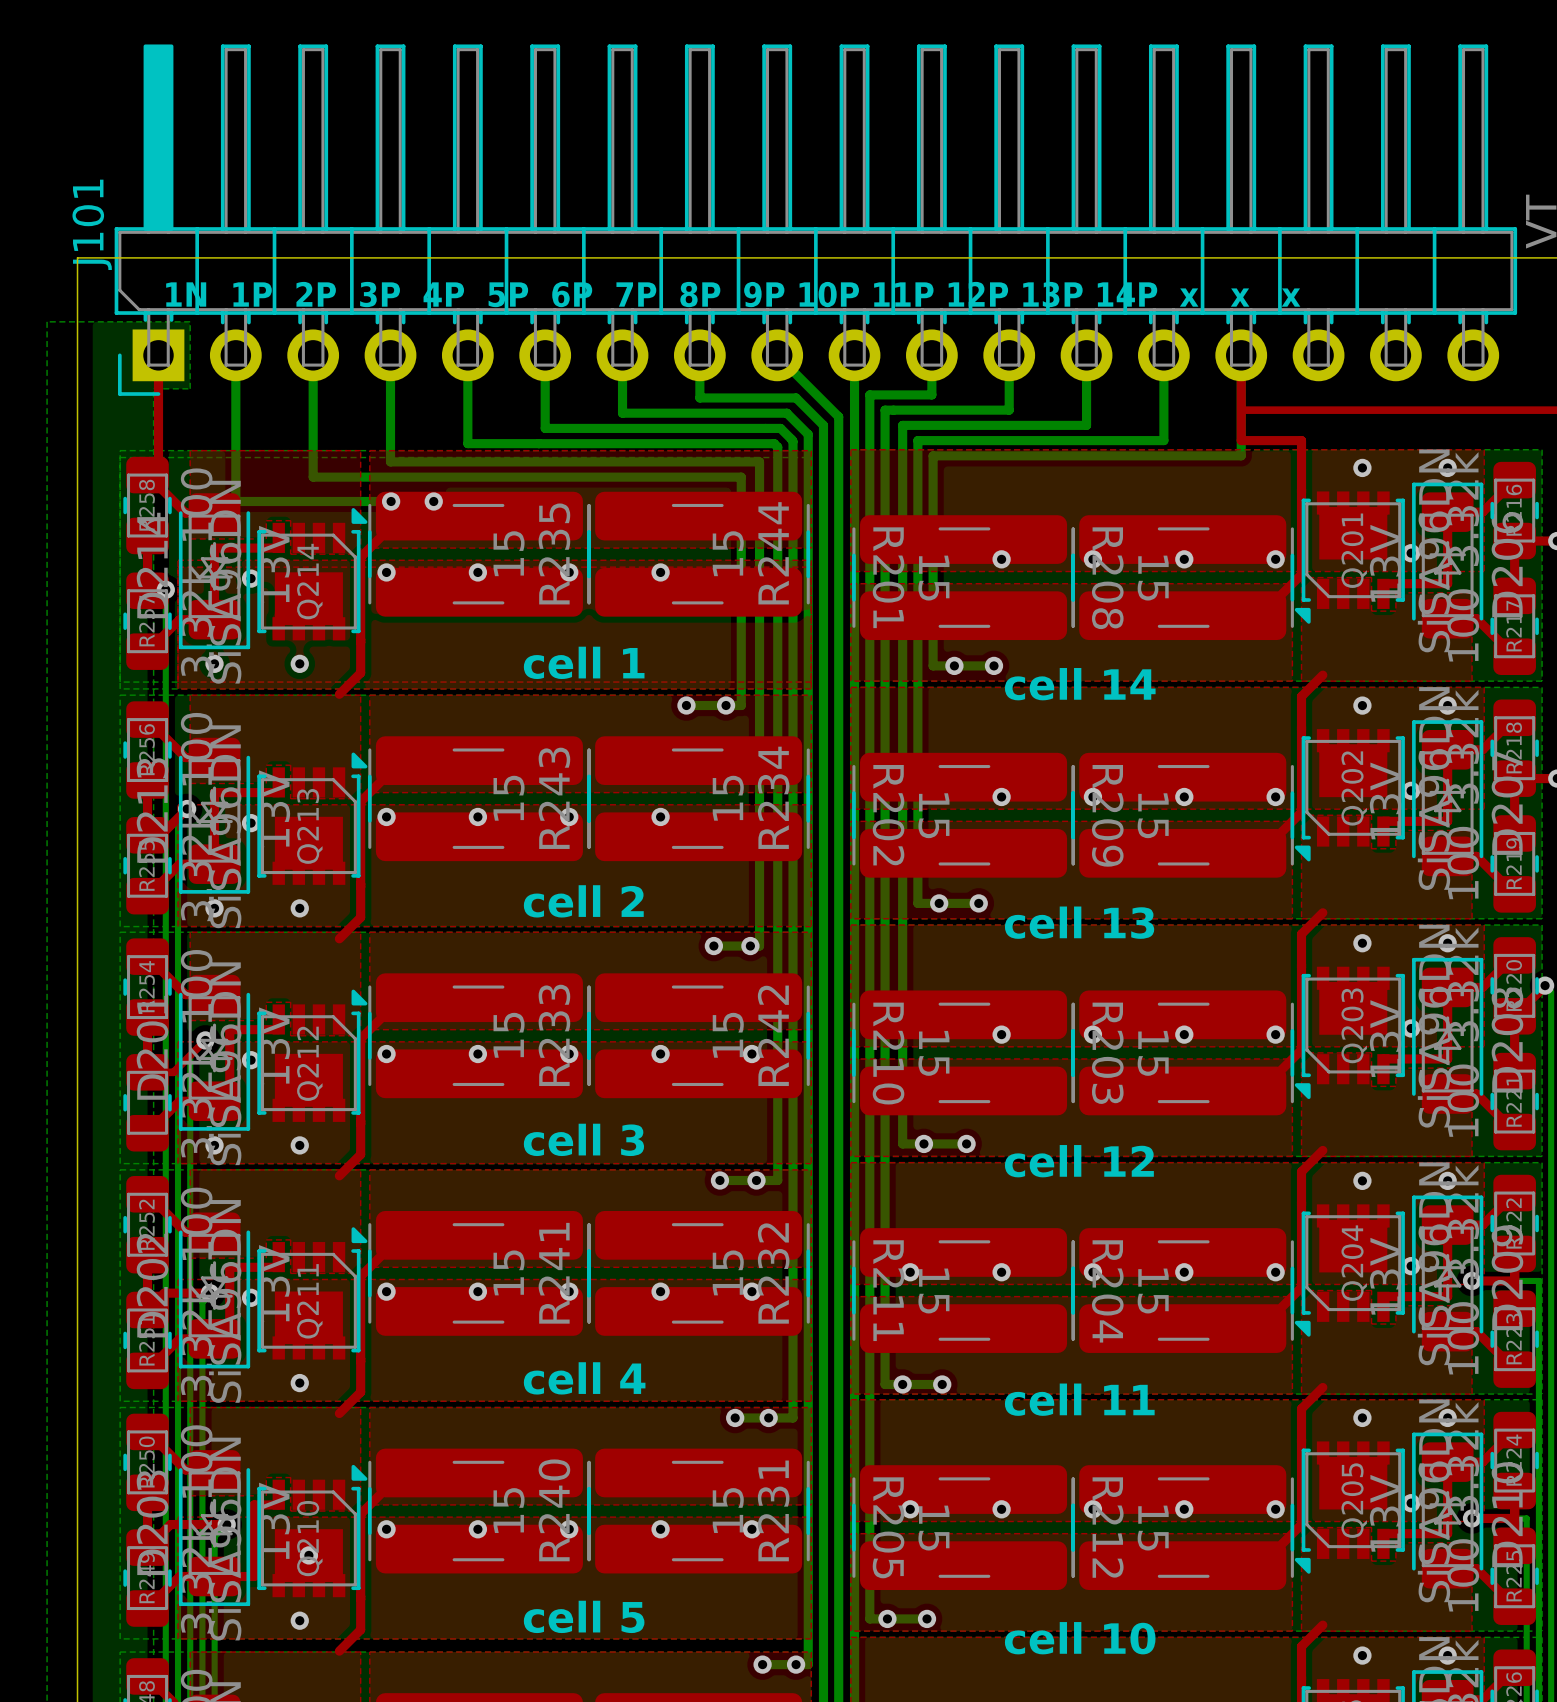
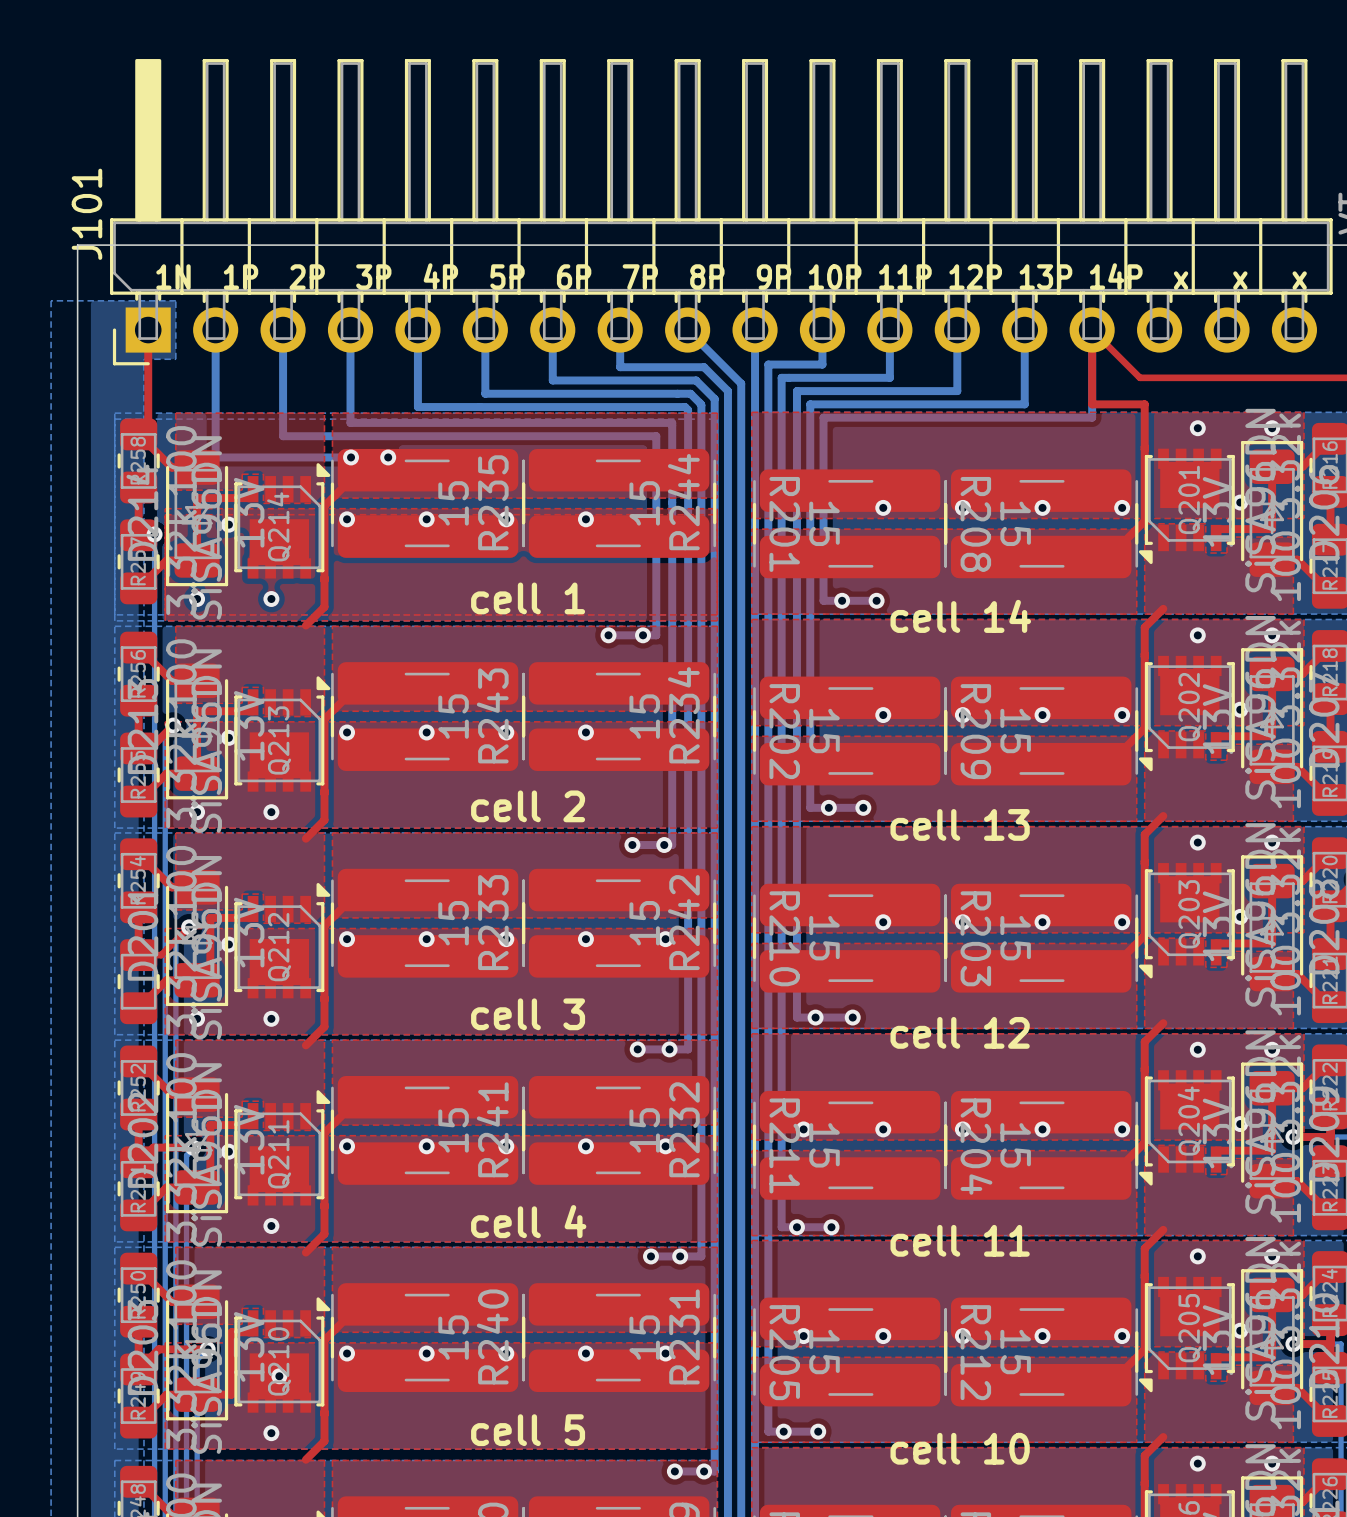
top track: (1241, 355) (1241, 410) (1296, 410) -> (1092, 330) (1139, 377)

